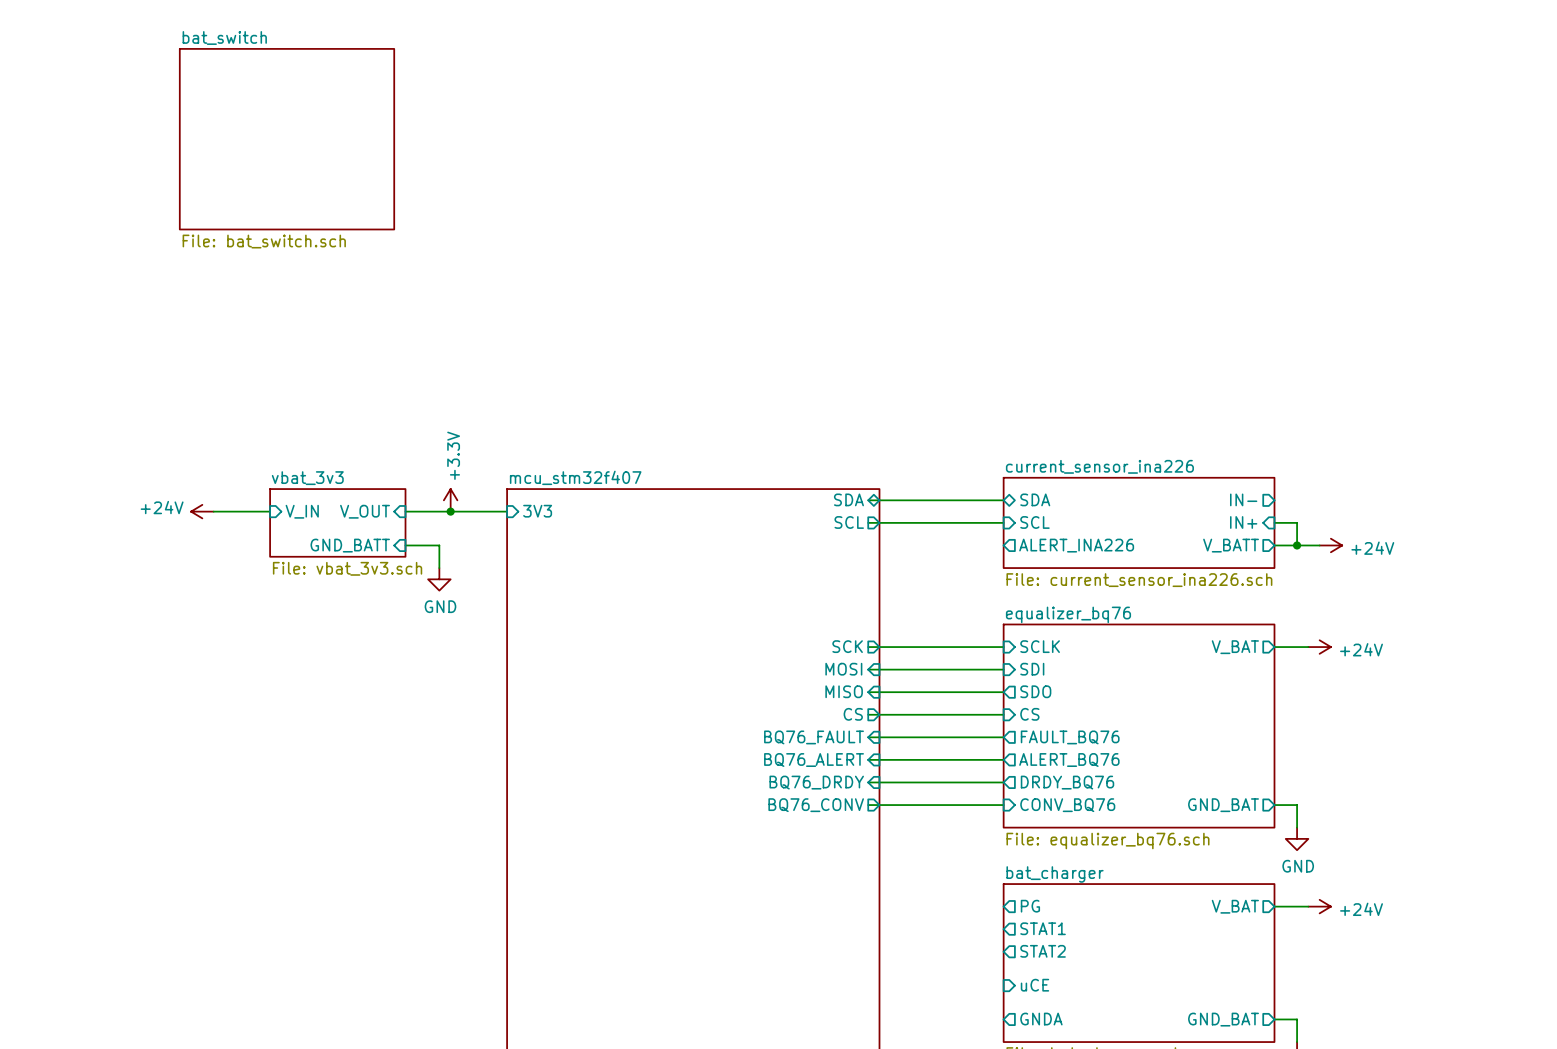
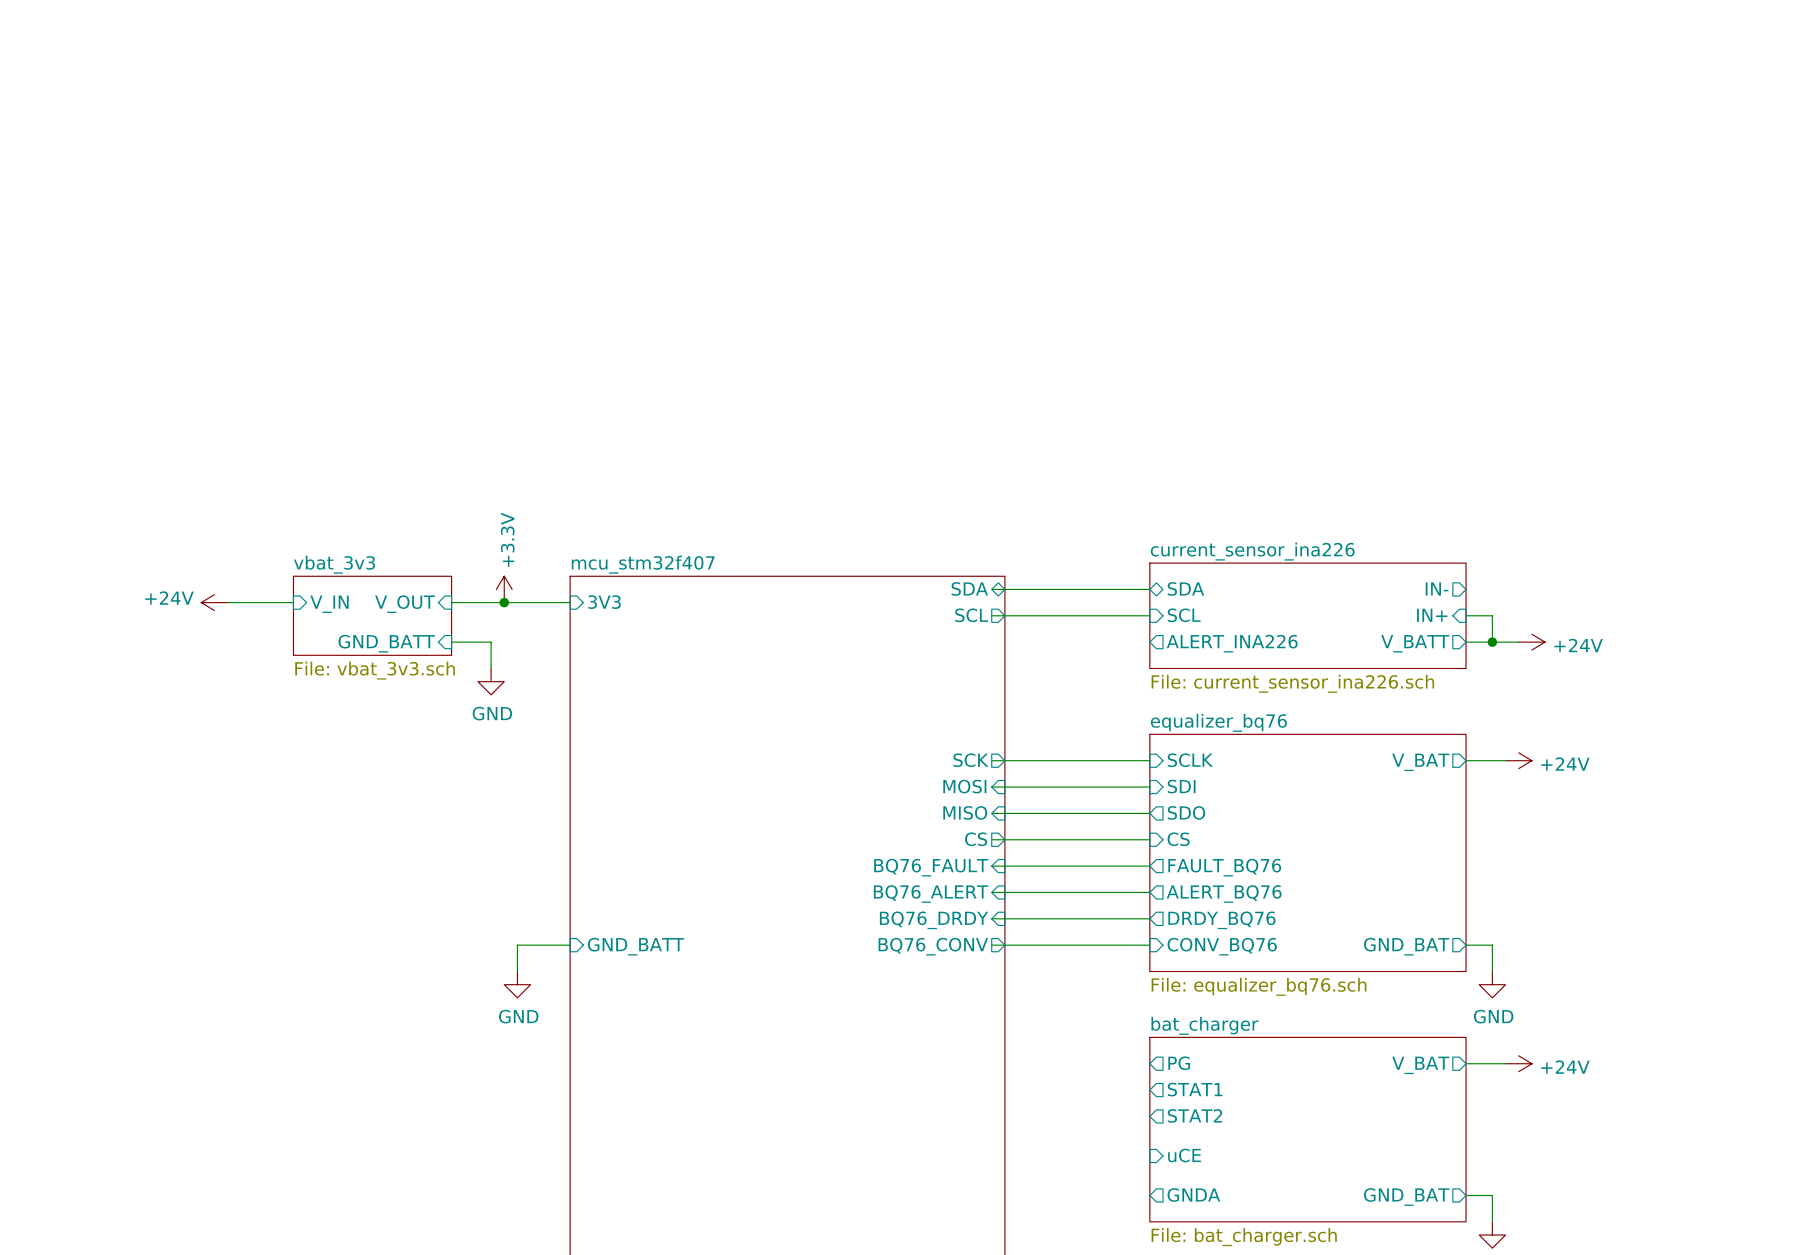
sheet bat_switch: File: bat_switch.sch (287, 139) -> none
wire: none -> (570, 945) (517, 945) (517, 971)
sheet pin: none -> GND_BATT (636, 946)
power symbol: none -> GND (517, 984)

